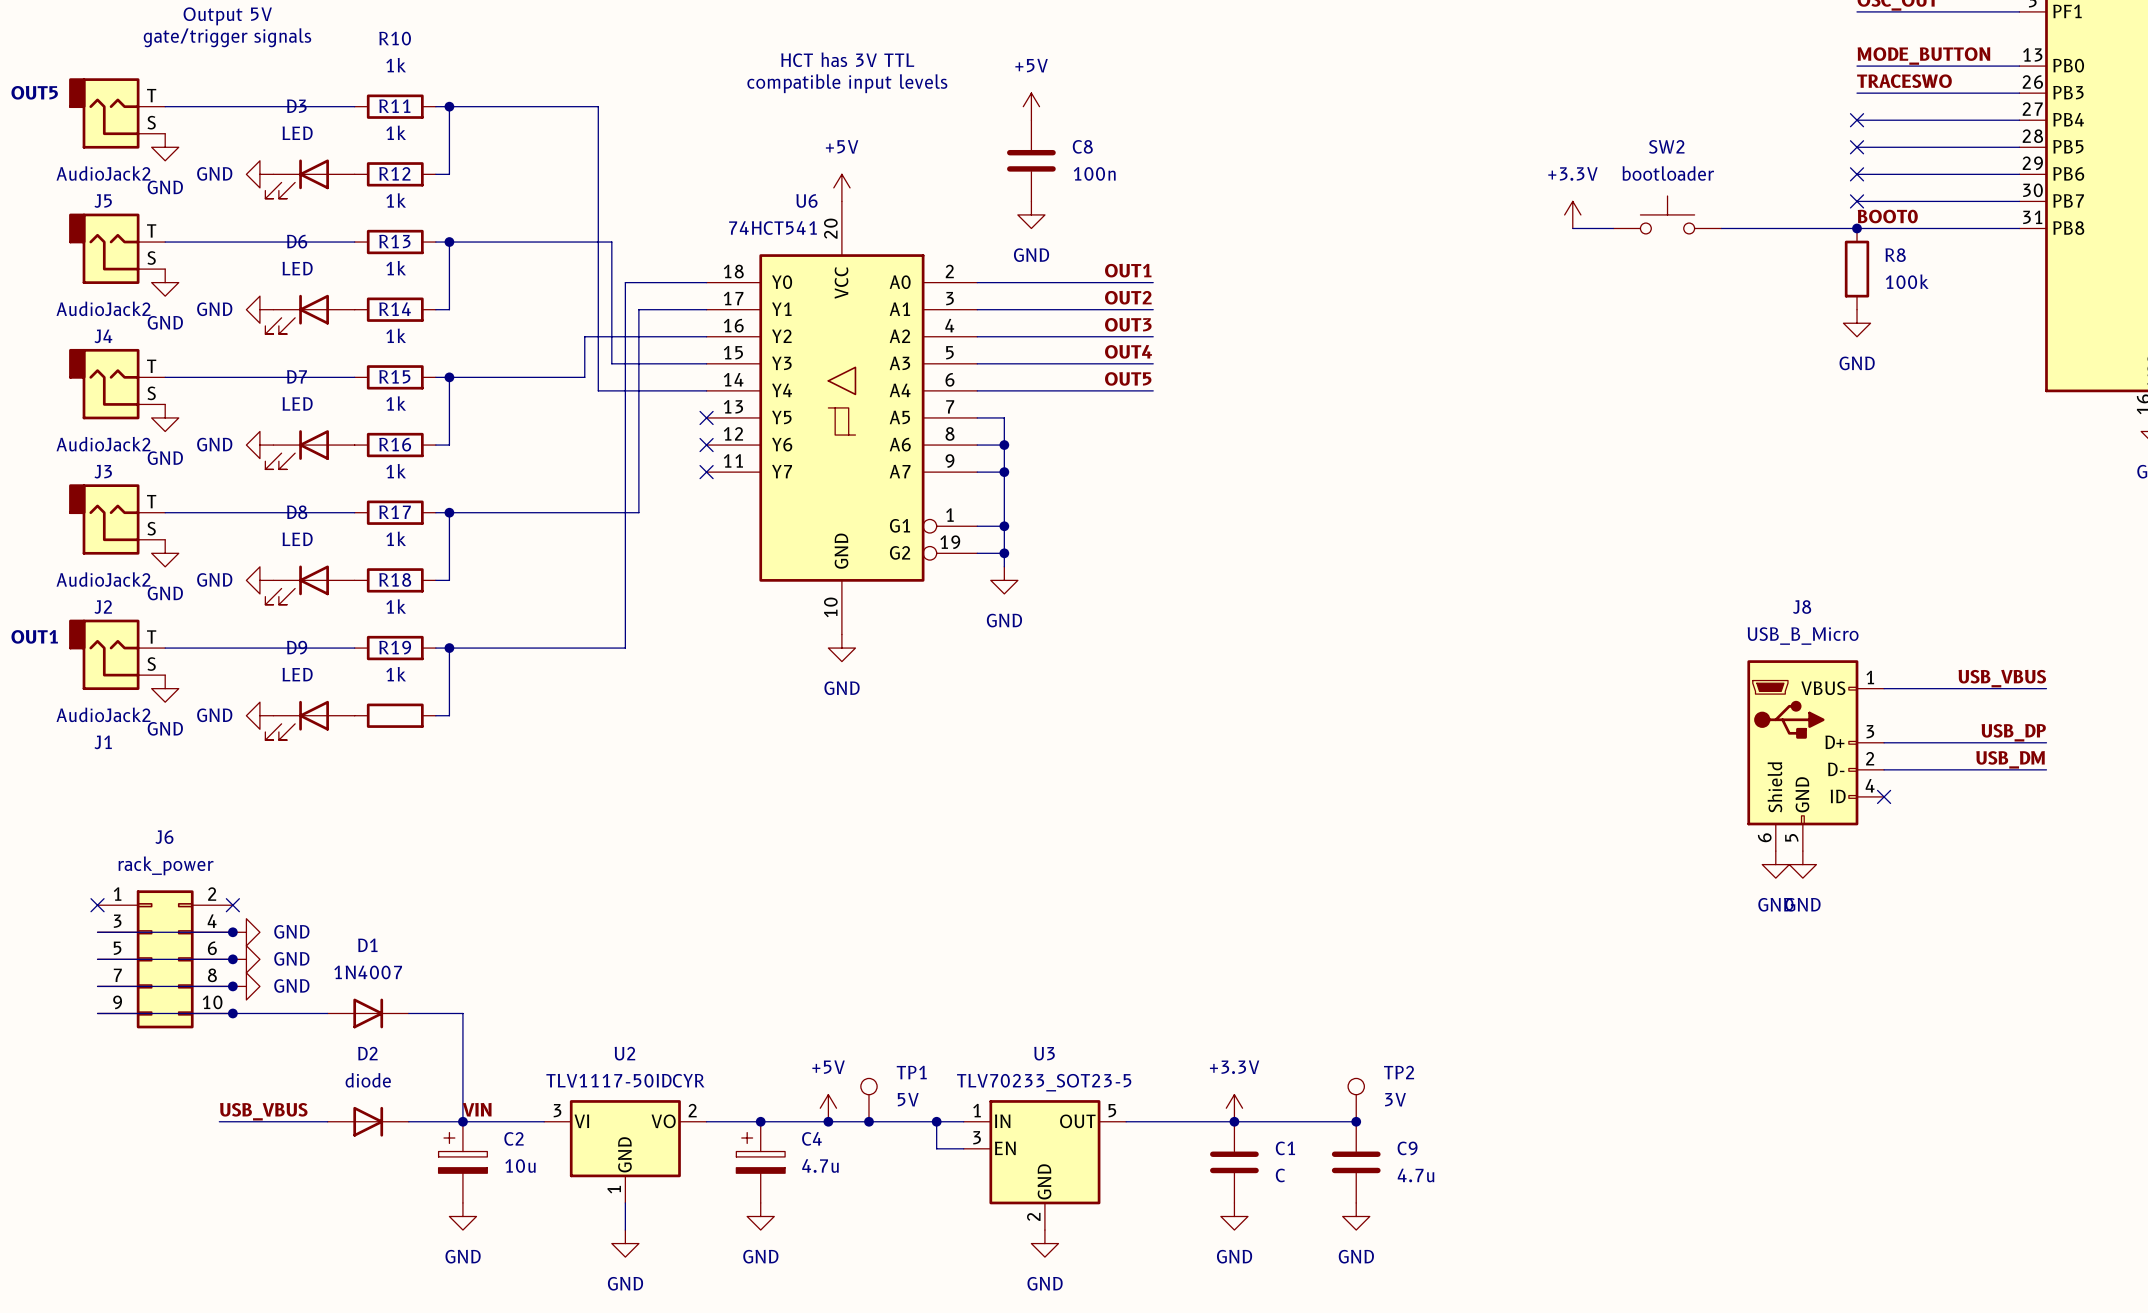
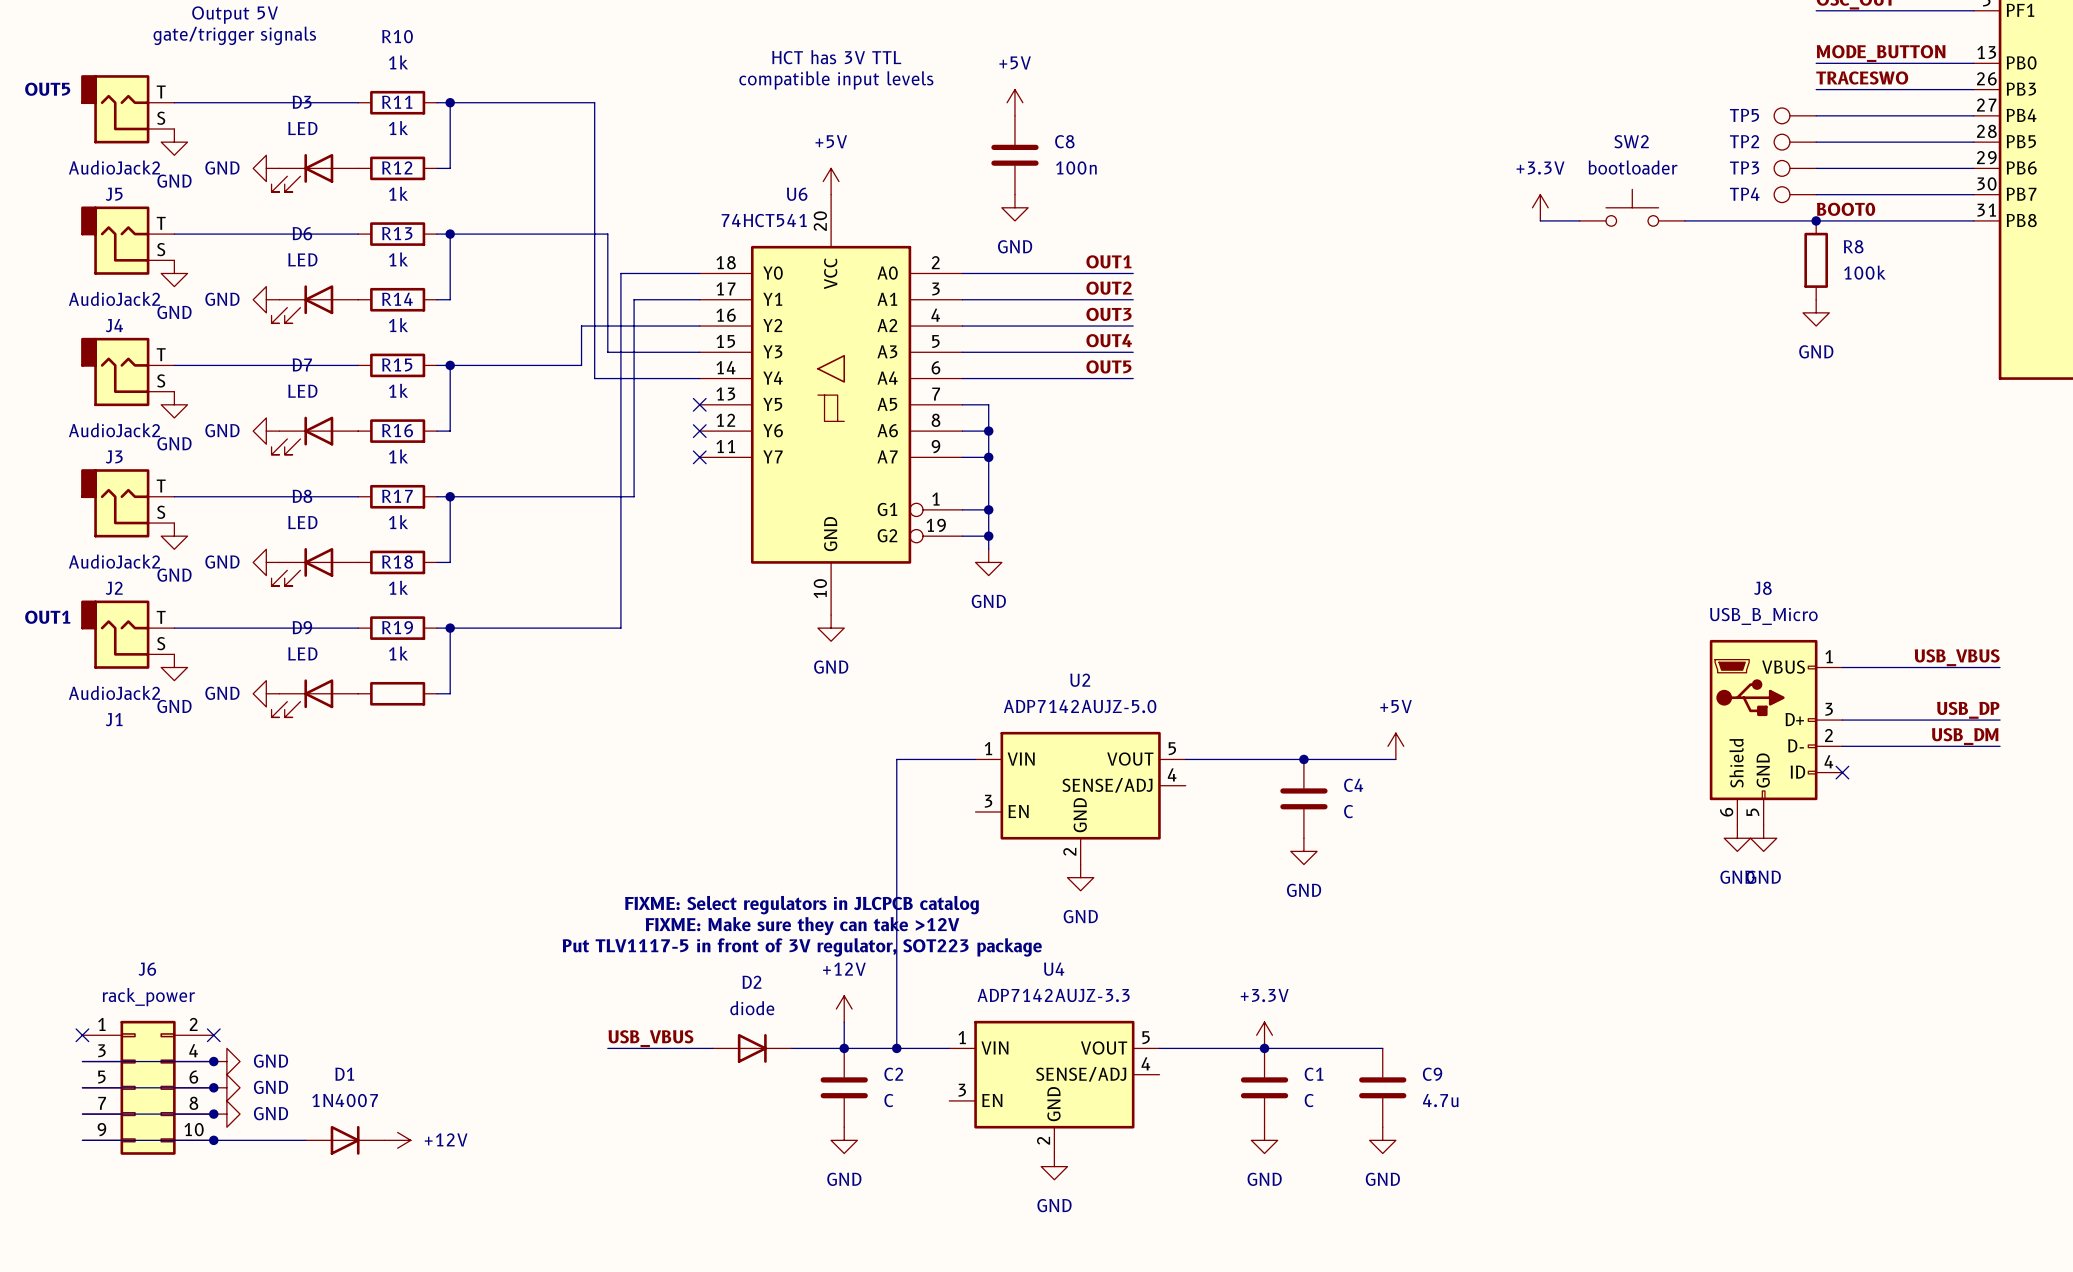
TP5: none -> (1795, 115)
no-connect mark: (1857, 120) -> none
no-connect mark: (1857, 147) -> none
TP3: none -> (1795, 168)
no-connect mark: (1857, 174) -> none
TP4: none -> (1795, 194)
no-connect mark: (1857, 201) -> none
power symbol: none -> +5V (1395, 746)
wire: none -> (975, 759) (896, 759) (896, 1048)
wire: none -> (1185, 759) (1395, 759)
junction: none -> (1303, 759)
power symbol: none -> GND (1303, 851)
no-connect mark: (97, 905) -> none
no-connect mark: (232, 905) -> none
power symbol: none -> GND (1080, 877)
wire: (97, 932) (232, 932) -> (82, 1061) (213, 1061)
junction: (232, 932) -> none
power symbol: GND (246, 932) -> none
text: none -> FIXME: Select regulators in JLCPCB catalog (801, 905)
text: none -> FIXME: Make sure they can take >12V (802, 926)
wire: (97, 959) (232, 959) -> (82, 1087) (213, 1087)
J6 position: (165, 959) -> (148, 1087)
junction: (232, 959) -> none
power symbol: GND (246, 959) -> none
text: none -> Put TLV1117-5 in front of 3V regulator, SOT223 package (802, 947)
wire: (97, 986) (232, 986) -> (82, 1114) (213, 1114)
junction: (232, 986) -> none
power symbol: GND (246, 986) -> none
wire: (97, 1013) (327, 1013) -> (82, 1140) (305, 1140)
junction: (232, 1013) -> none
D1 position: (368, 1013) -> (345, 1140)
wire: (408, 1013) (462, 1013) (462, 1121) -> none
power symbol: none -> +12V (844, 1009)
U2 name position: U2 (624, 1053) -> U2 (1080, 680)
wire: none -> (844, 1022) (844, 1048)
no-connect mark: none -> (82, 1035)
no-connect mark: none -> (213, 1035)
label: none -> USB_VBUS (650, 1038)
TP2 name position: TP2 (1399, 1072) -> TP2 (1744, 141)
U2 value: TLV1117-50IDCYR (625, 1080) -> ADP7142AUJZ-5.0 (1080, 706)
wire: none -> (607, 1048) (712, 1048)
wire: none -> (791, 1048) (949, 1048)
junction: none -> (844, 1048)
junction: none -> (896, 1048)
junction: none -> (1264, 1048)
TP2 rotation: 0° (1356, 1086) -> 90° counterclockwise (1782, 142)
junction: none -> (213, 1061)
power symbol: none -> GND (226, 1061)
TP2 value: 3V (1395, 1099) -> none
U2 symbol: [544, 1100, 707, 1203] -> [975, 731, 1186, 865]
TP1: 5V (868, 1100) -> none
TP2 position: (1356, 1100) -> (1795, 142)
power symbol: +5V (828, 1108) -> none
power symbol position: +3.3V (1234, 1108) -> +3.3V (1264, 1035)
label: VIN (477, 1109) -> none
label: USB_VBUS (263, 1111) -> none
junction: none -> (213, 1087)
wire: (219, 1121) (327, 1121) -> none
power symbol: none -> GND (226, 1087)
D2 position: (368, 1121) -> (752, 1048)
wire: (408, 1121) (544, 1121) -> none
C2 symbol: [438, 1121, 488, 1203] -> [820, 1048, 868, 1128]
junction: (462, 1121) -> none
wire: (706, 1121) (963, 1121) -> none
C4 symbol: [736, 1121, 786, 1203] -> [1280, 759, 1328, 839]
junction: (760, 1121) -> none
junction: (828, 1121) -> none
junction: (868, 1121) -> none
wire: (936, 1121) (936, 1148) (963, 1148) -> none
junction: (936, 1121) -> none
U4: none -> ADP7142AUJZ-3.3 (1054, 1087)
wire: (1126, 1121) (1356, 1121) -> (1159, 1048) (1382, 1048)
junction: (1234, 1121) -> none
junction: (1356, 1121) -> none
junction: none -> (213, 1114)
power symbol: none -> GND (226, 1114)
C1 position: (1234, 1162) -> (1264, 1087)
C9 position: (1356, 1162) -> (1382, 1087)
C2 value: 10u (520, 1165) -> C (888, 1100)
C4 value: 4.7u (820, 1165) -> C (1348, 811)
U3: TLV70233_SOT23-5 (1044, 1165) -> none
junction: none -> (213, 1140)
power symbol: none -> +12V (397, 1140)
power symbol: none -> GND (844, 1140)
power symbol: none -> GND (1264, 1140)
power symbol: none -> GND (1382, 1140)
wire: (625, 1202) (625, 1230) -> none
power symbol: GND (462, 1216) -> none
power symbol: GND (760, 1216) -> none
power symbol: GND (1234, 1216) -> none
power symbol: GND (1356, 1216) -> none
power symbol: GND (625, 1243) -> none
power symbol position: GND (1044, 1243) -> GND (1054, 1166)

